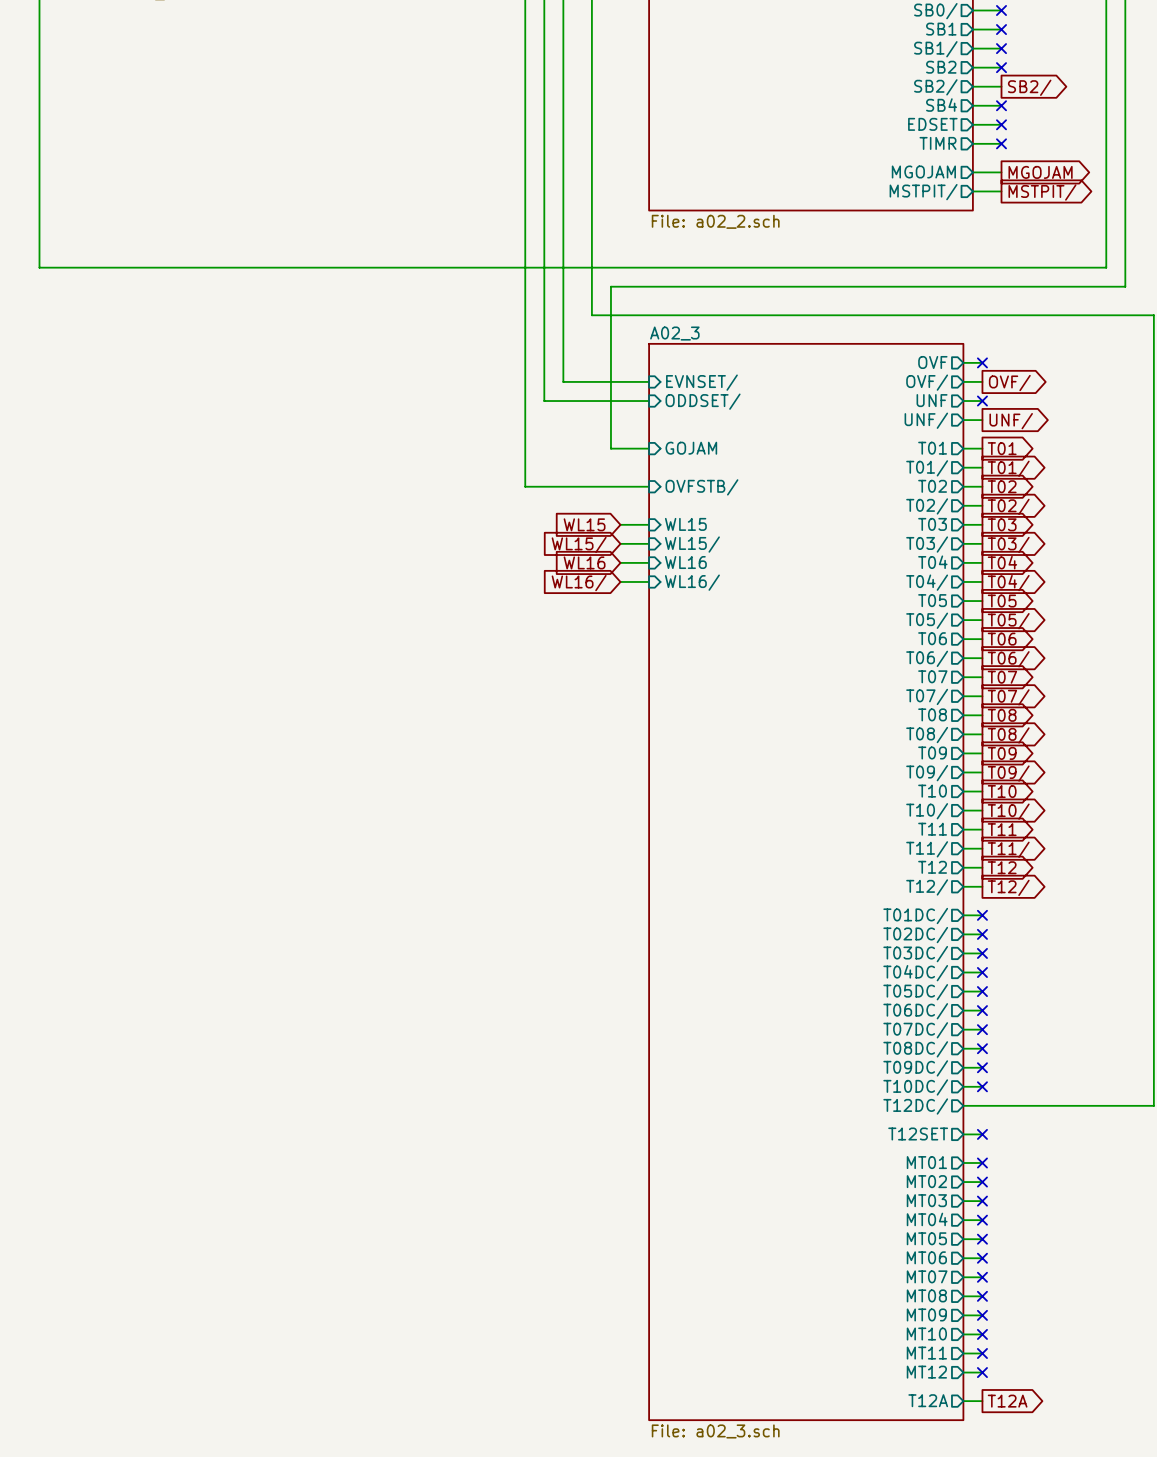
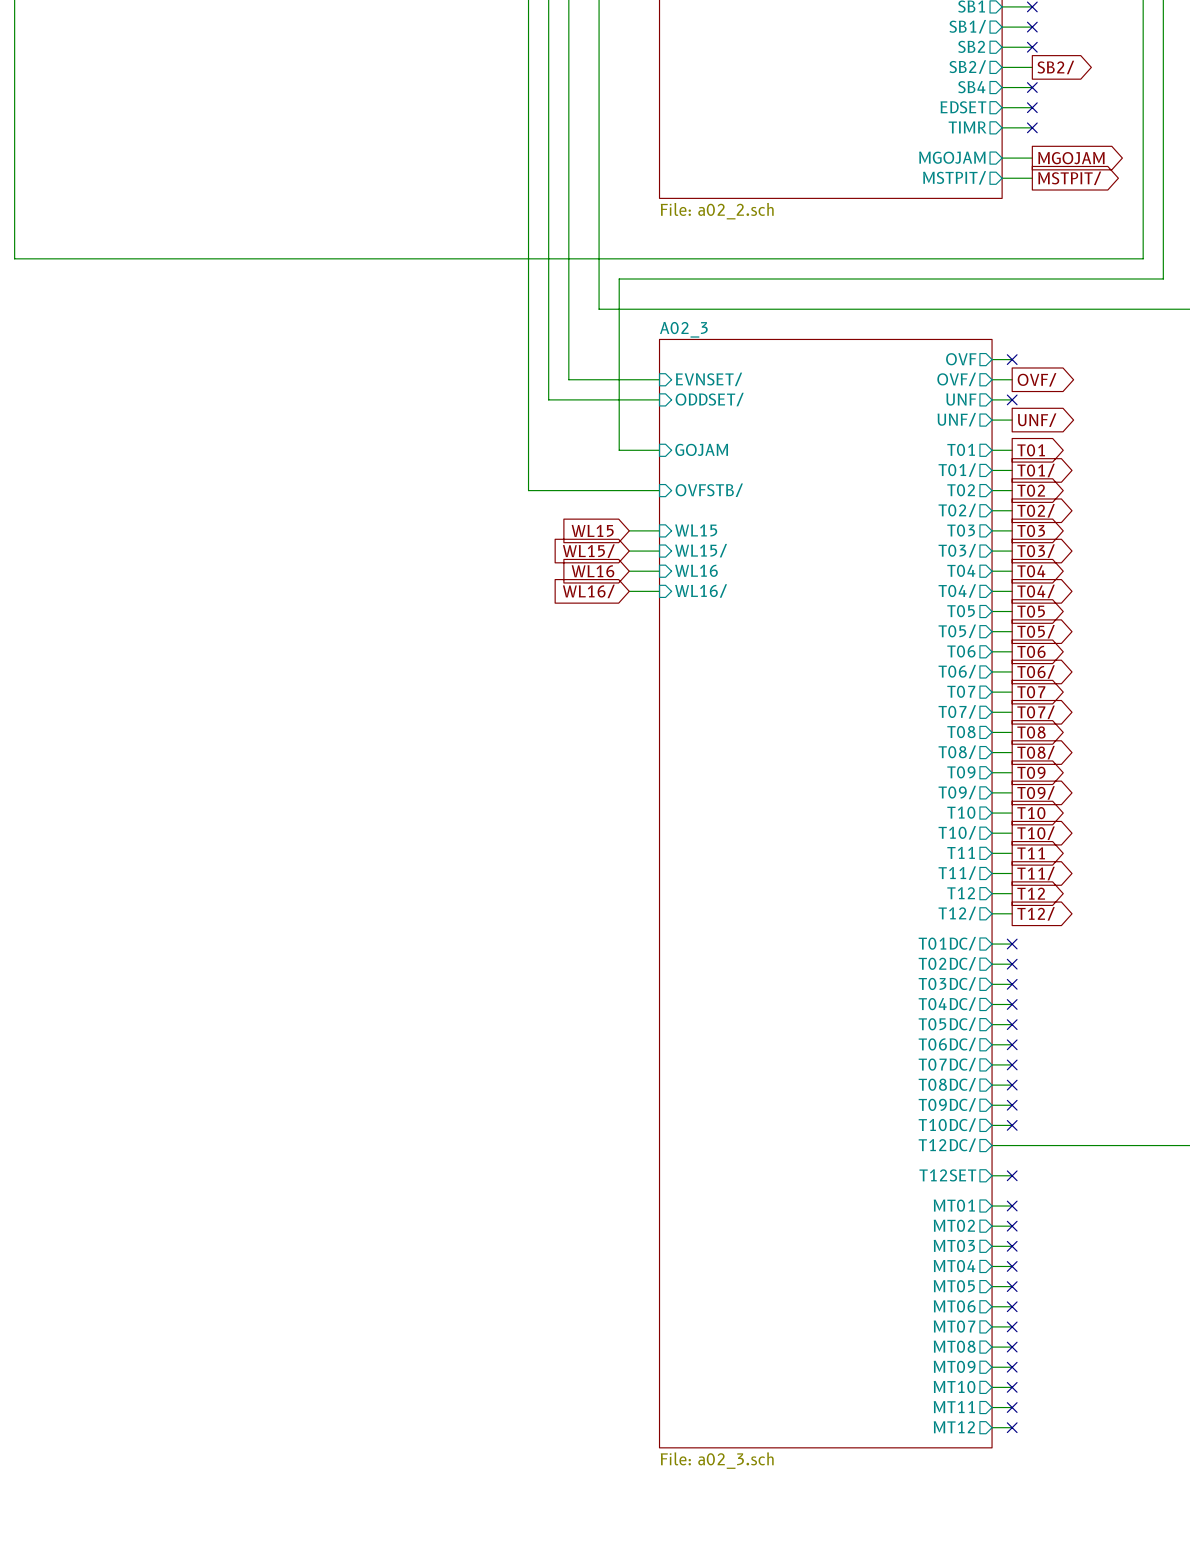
sheet A02_3 shape: [649, 343, 964, 1421] -> [659, 339, 993, 1448]
sheet pin: T12A (928, 1400) -> none
wire: (963, 1401) (982, 1401) -> none
global label: T12A (1007, 1401) -> none

